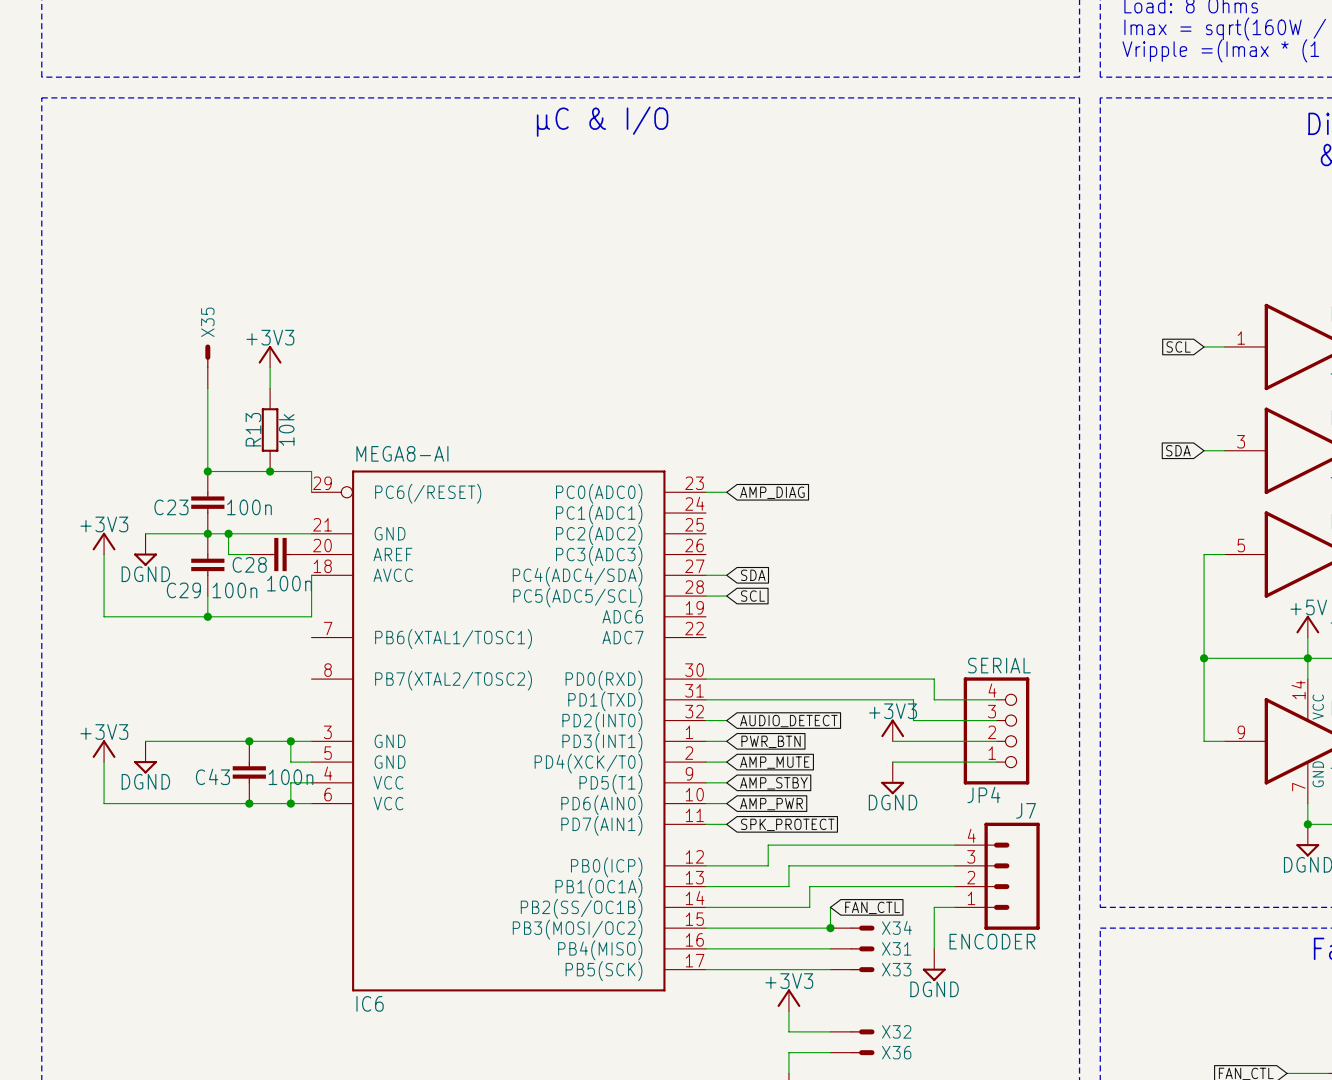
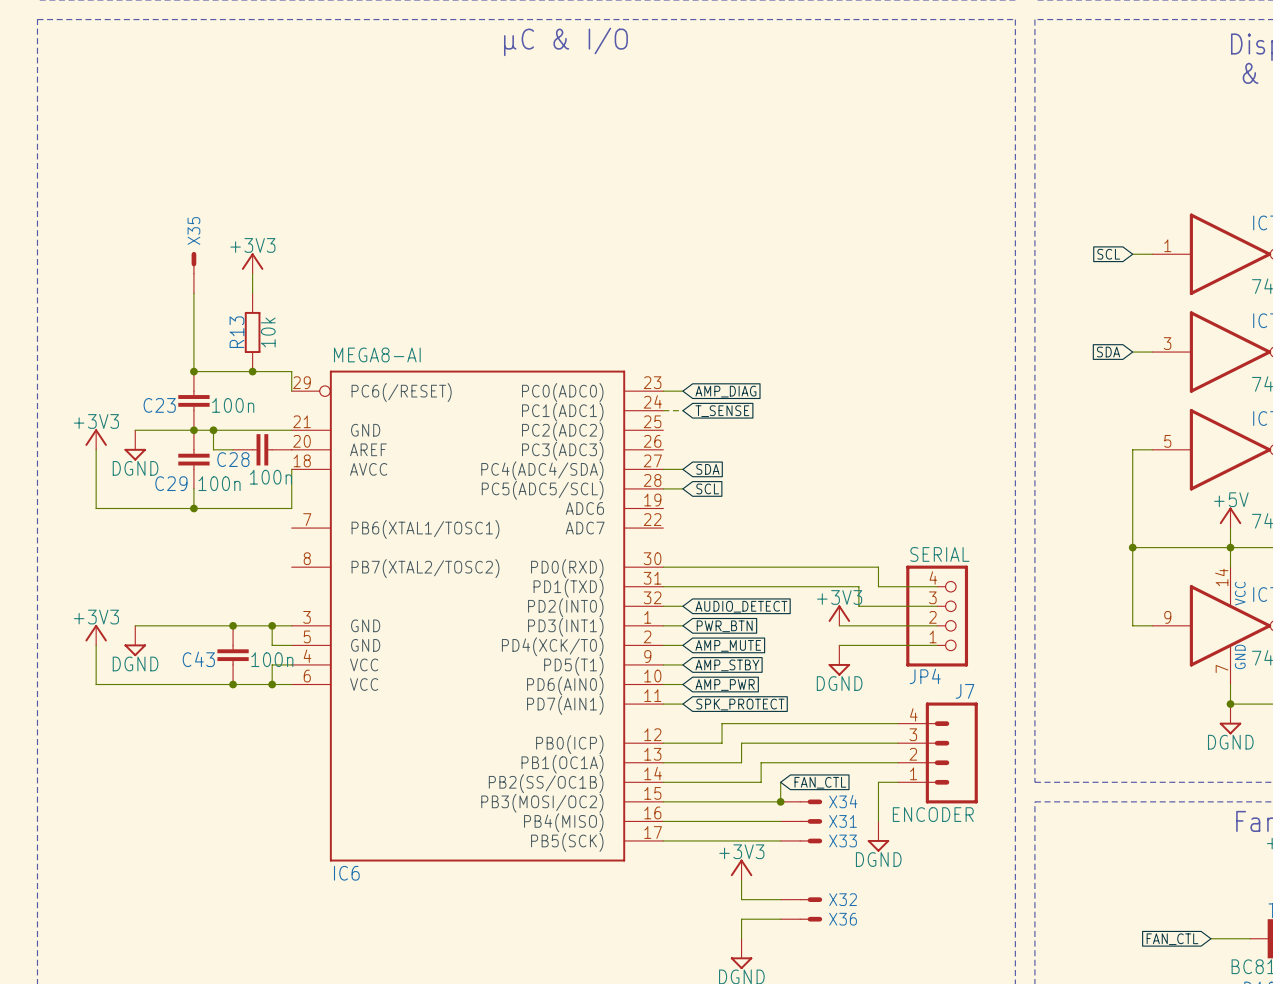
wire: none -> (663, 410) (682, 410)
global label: none -> T_SENSE (722, 411)

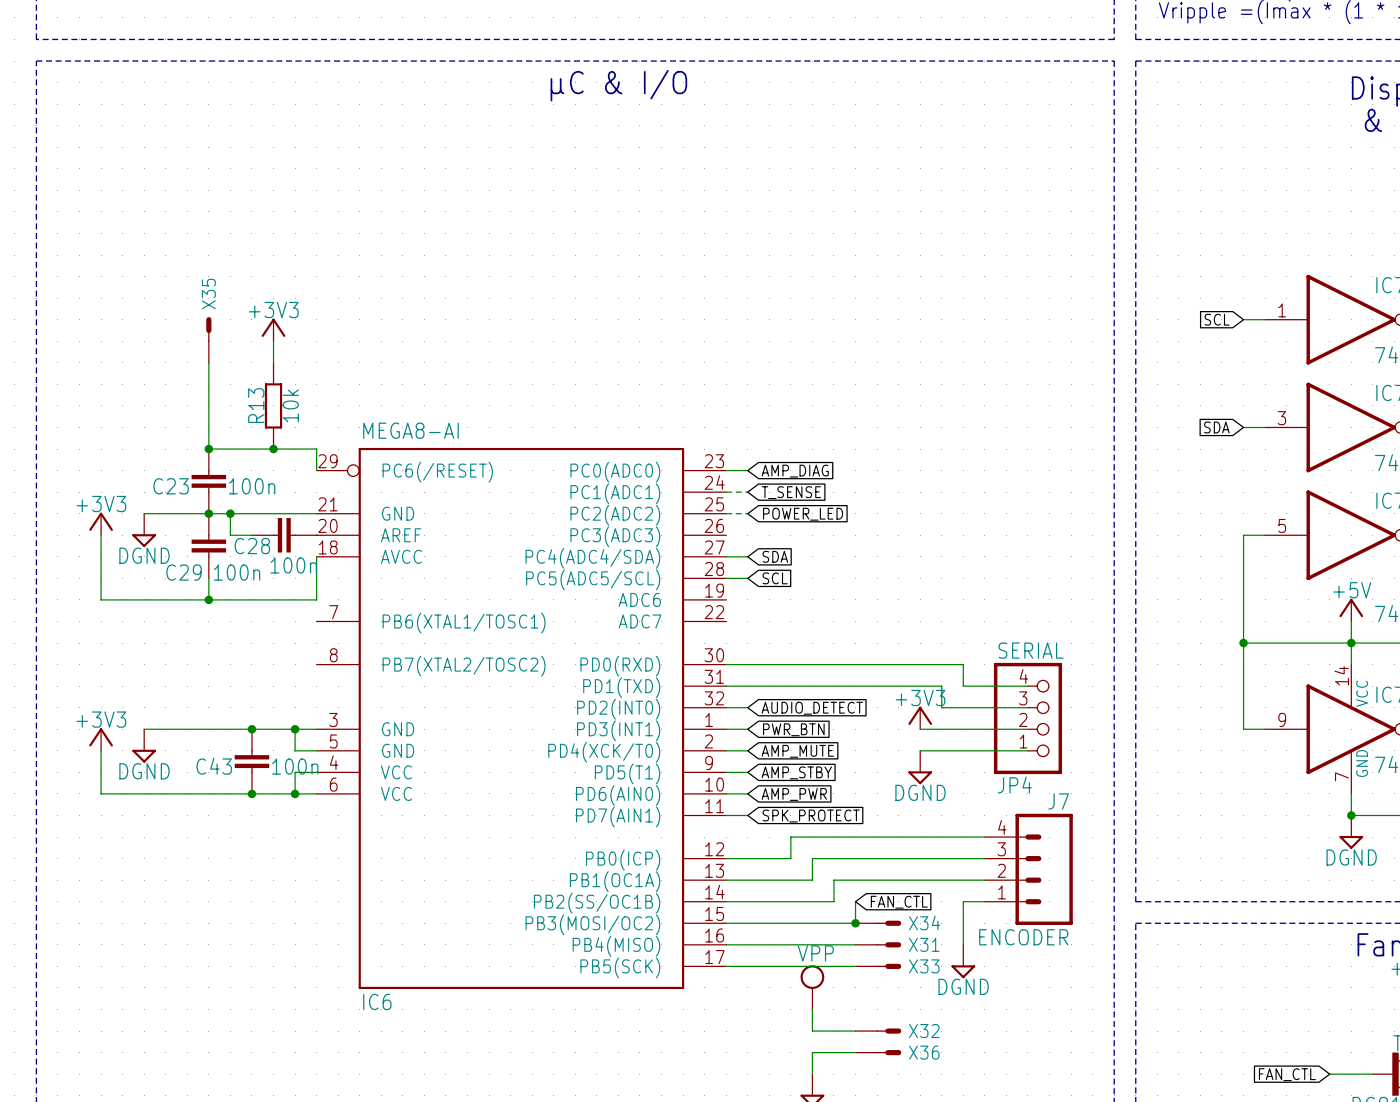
wire: none -> (726, 513) (747, 513)
global label: none -> POWER_LED (803, 514)
power symbol: none -> VPP (812, 987)
power symbol: +3V3 (741, 869) -> none

